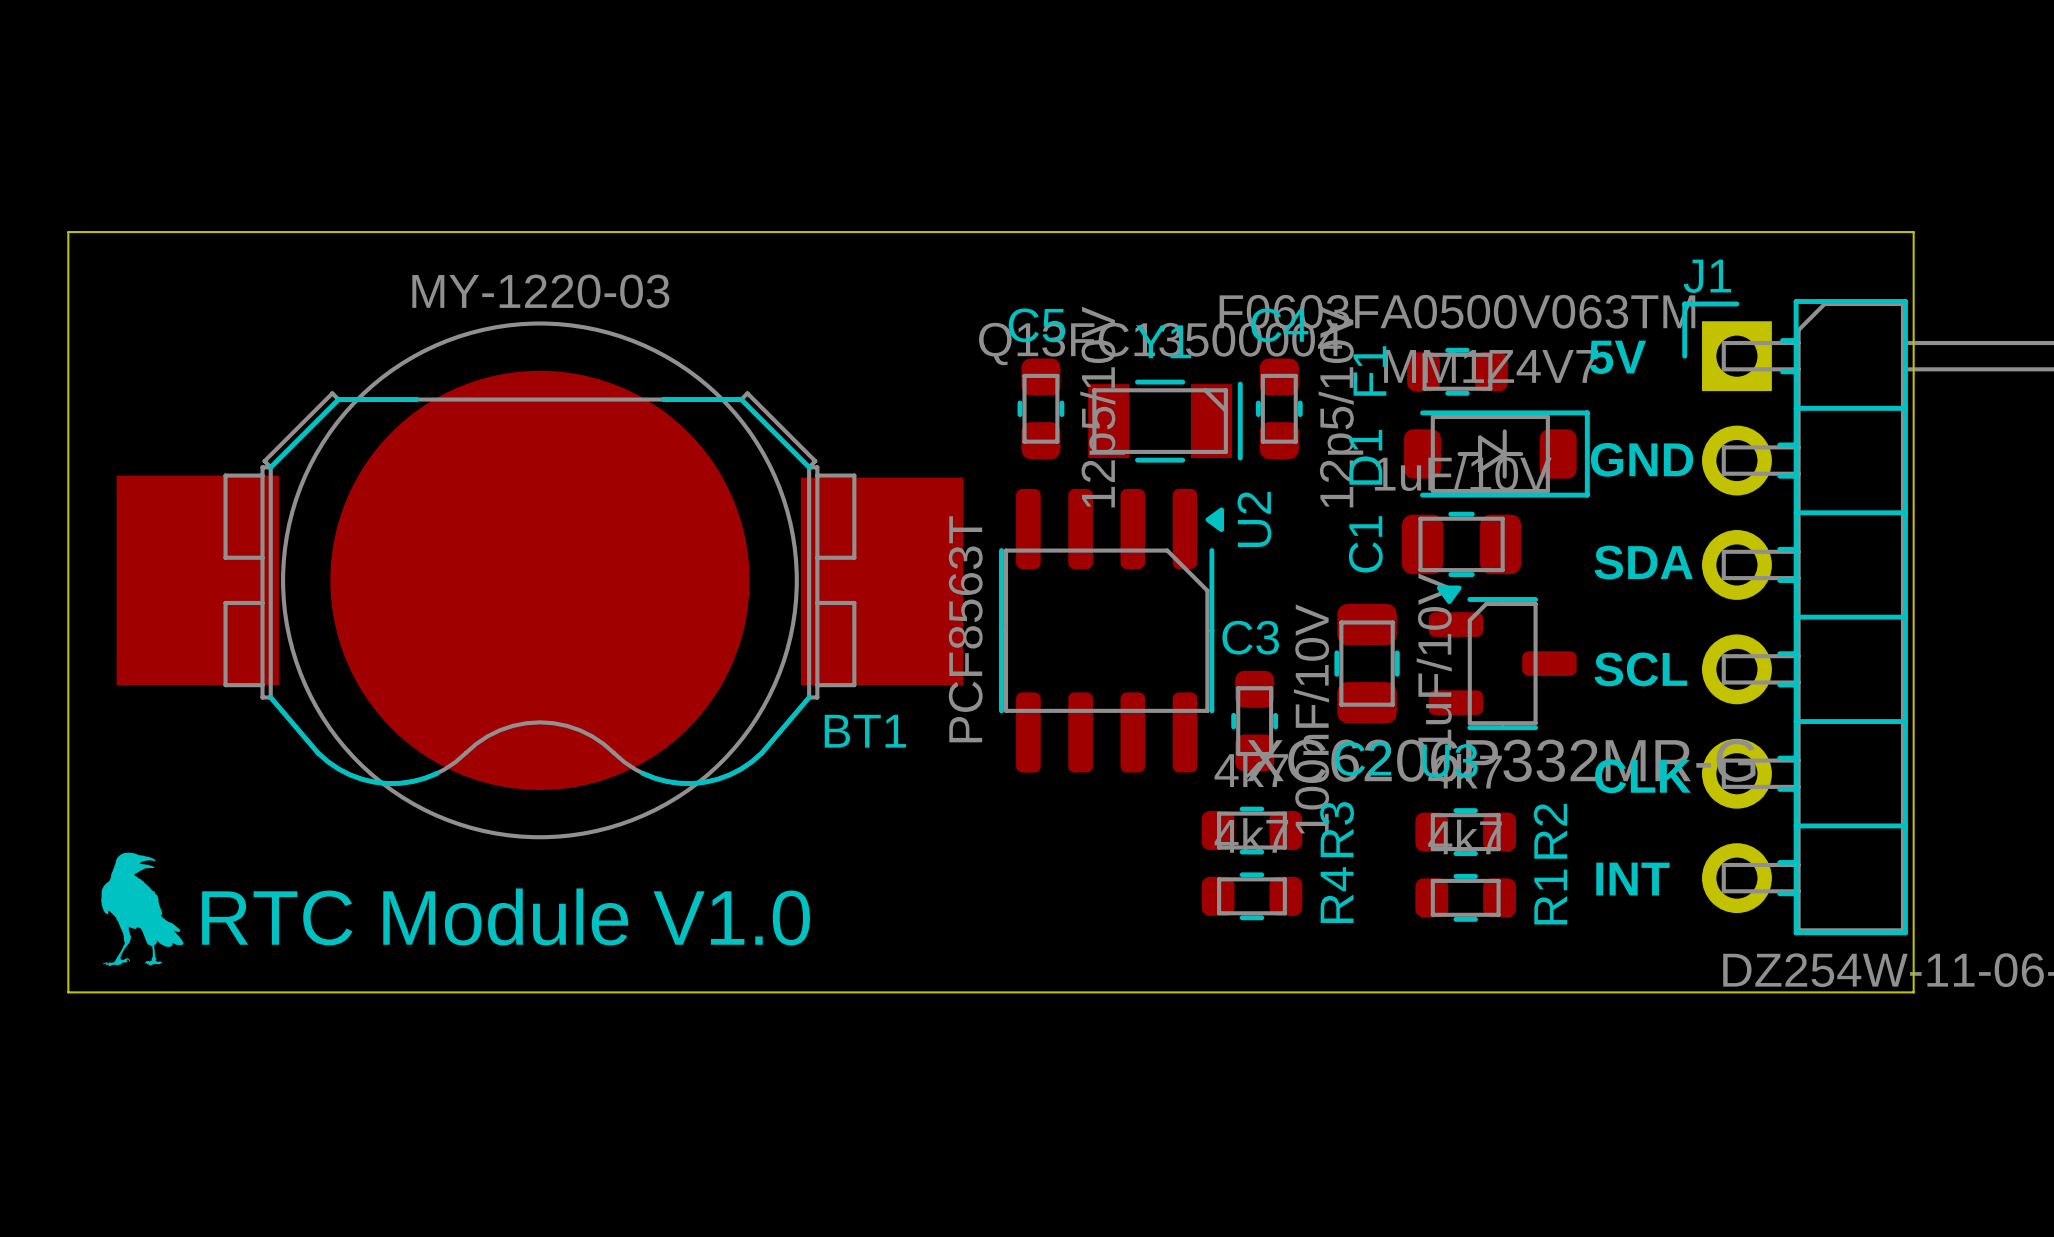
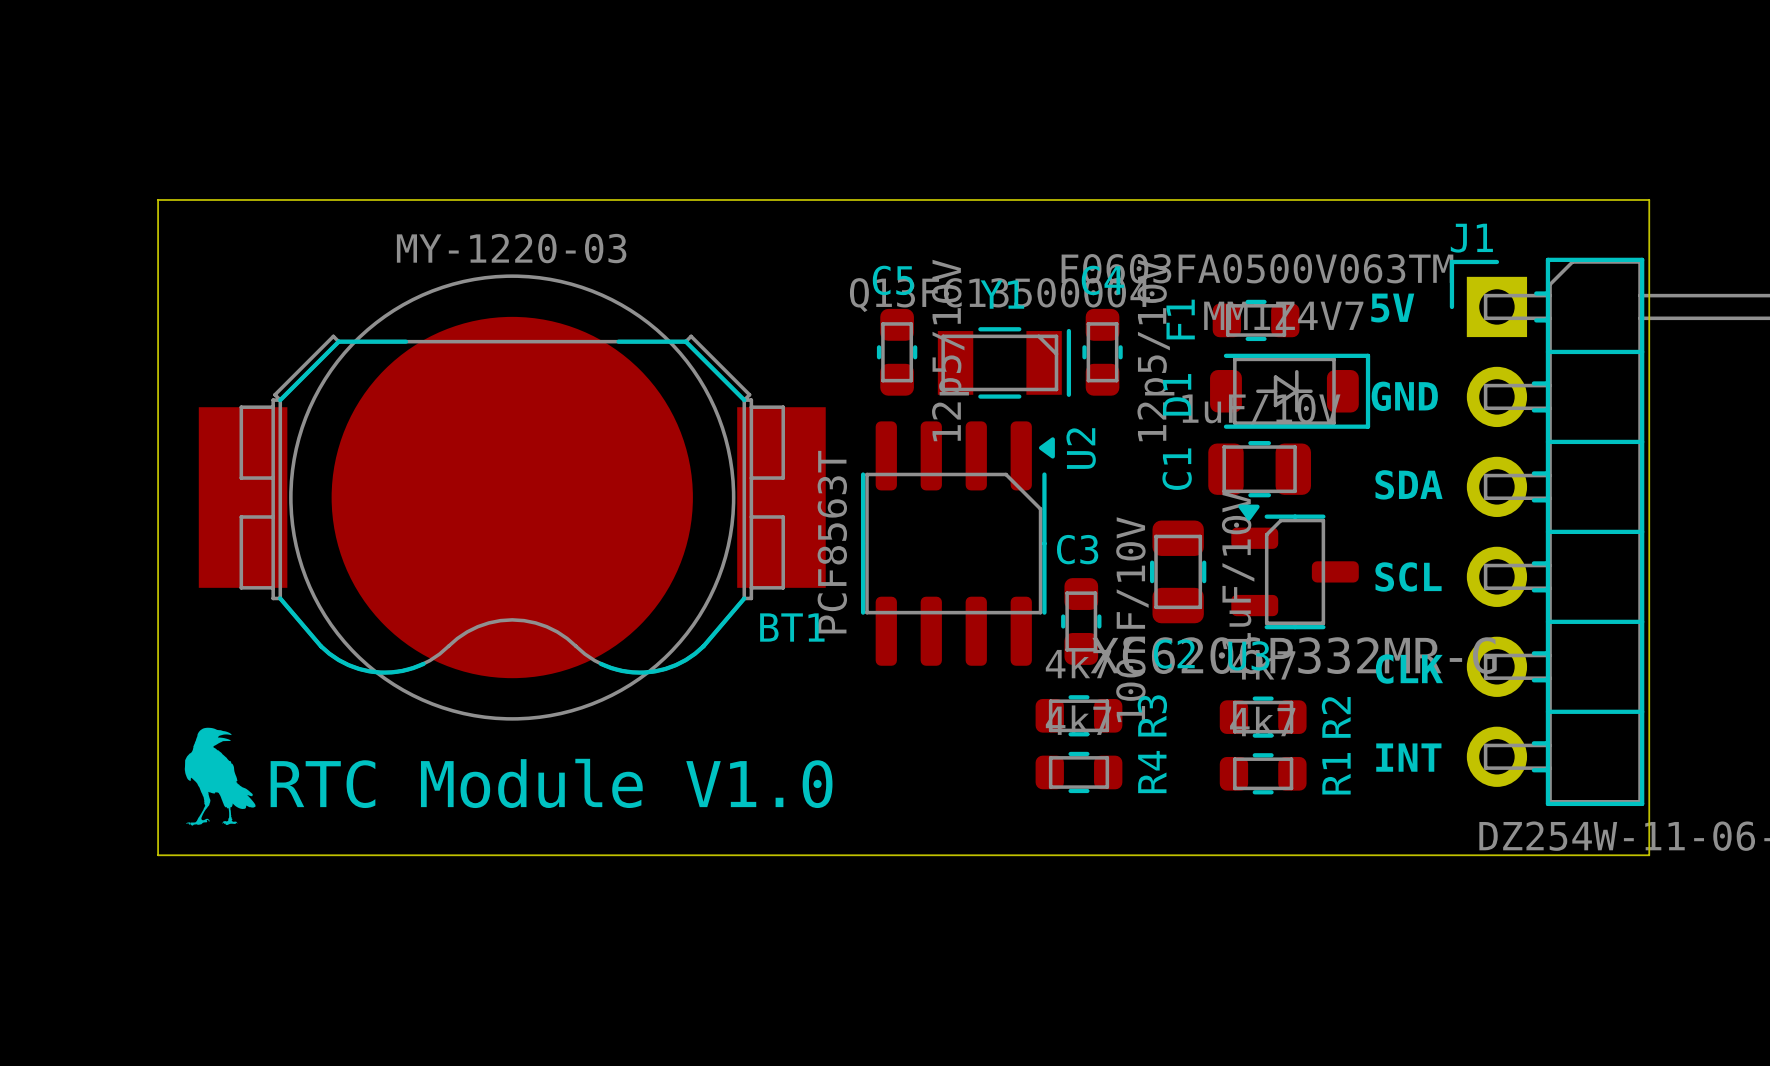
board edge: (183, 232) (68, 232) (68, 992) (183, 992) -> (158, 199) (158, 855)
BT1 footprint: [116, 321, 964, 840] -> [198, 274, 826, 721]
drawing position: (142, 909) -> (220, 776)
text position: RTC Module V1.0 (506, 916) -> RTC Module V1.0 (551, 783)

